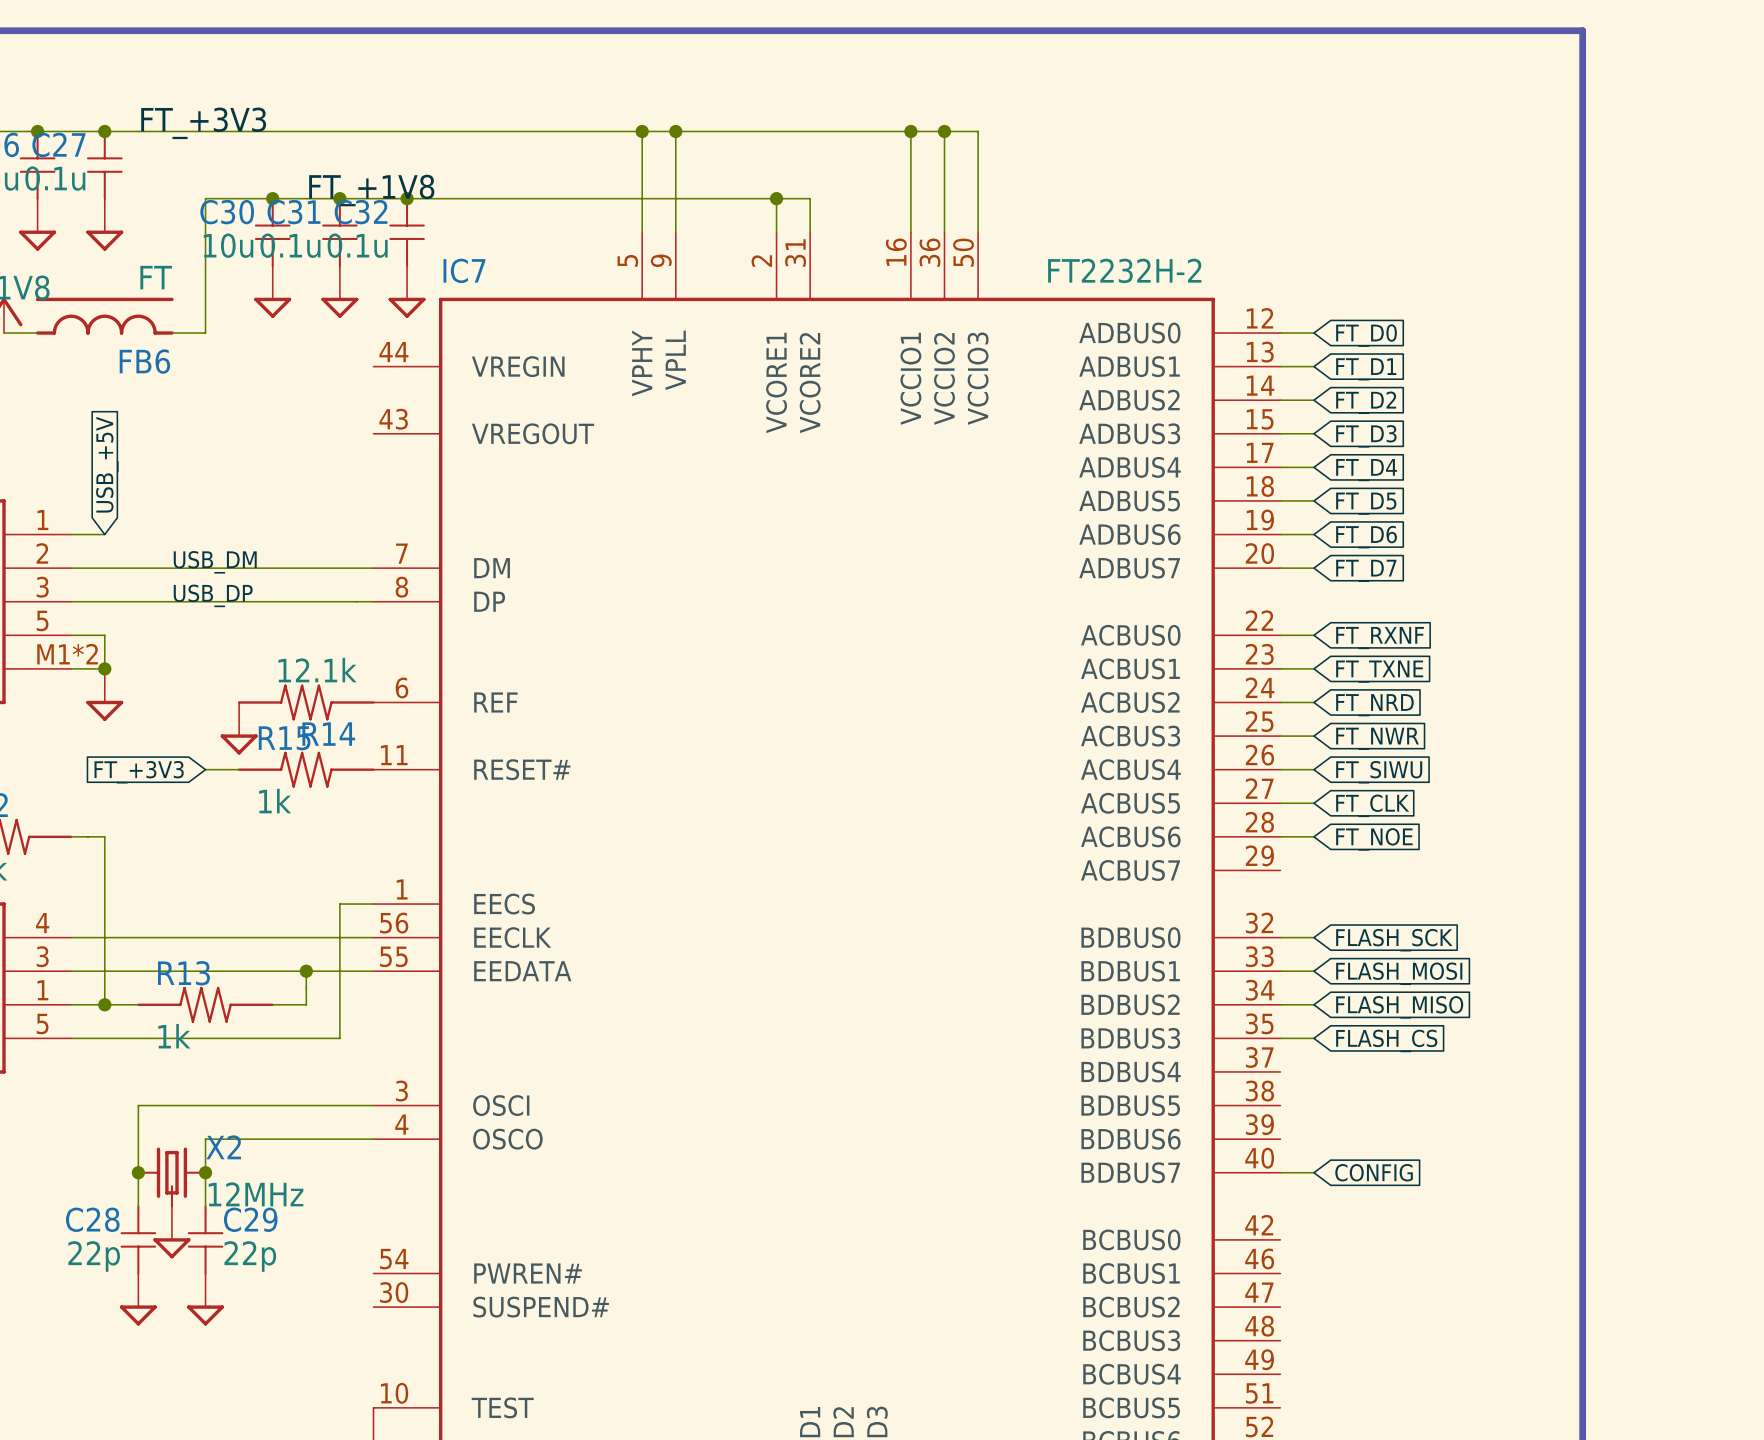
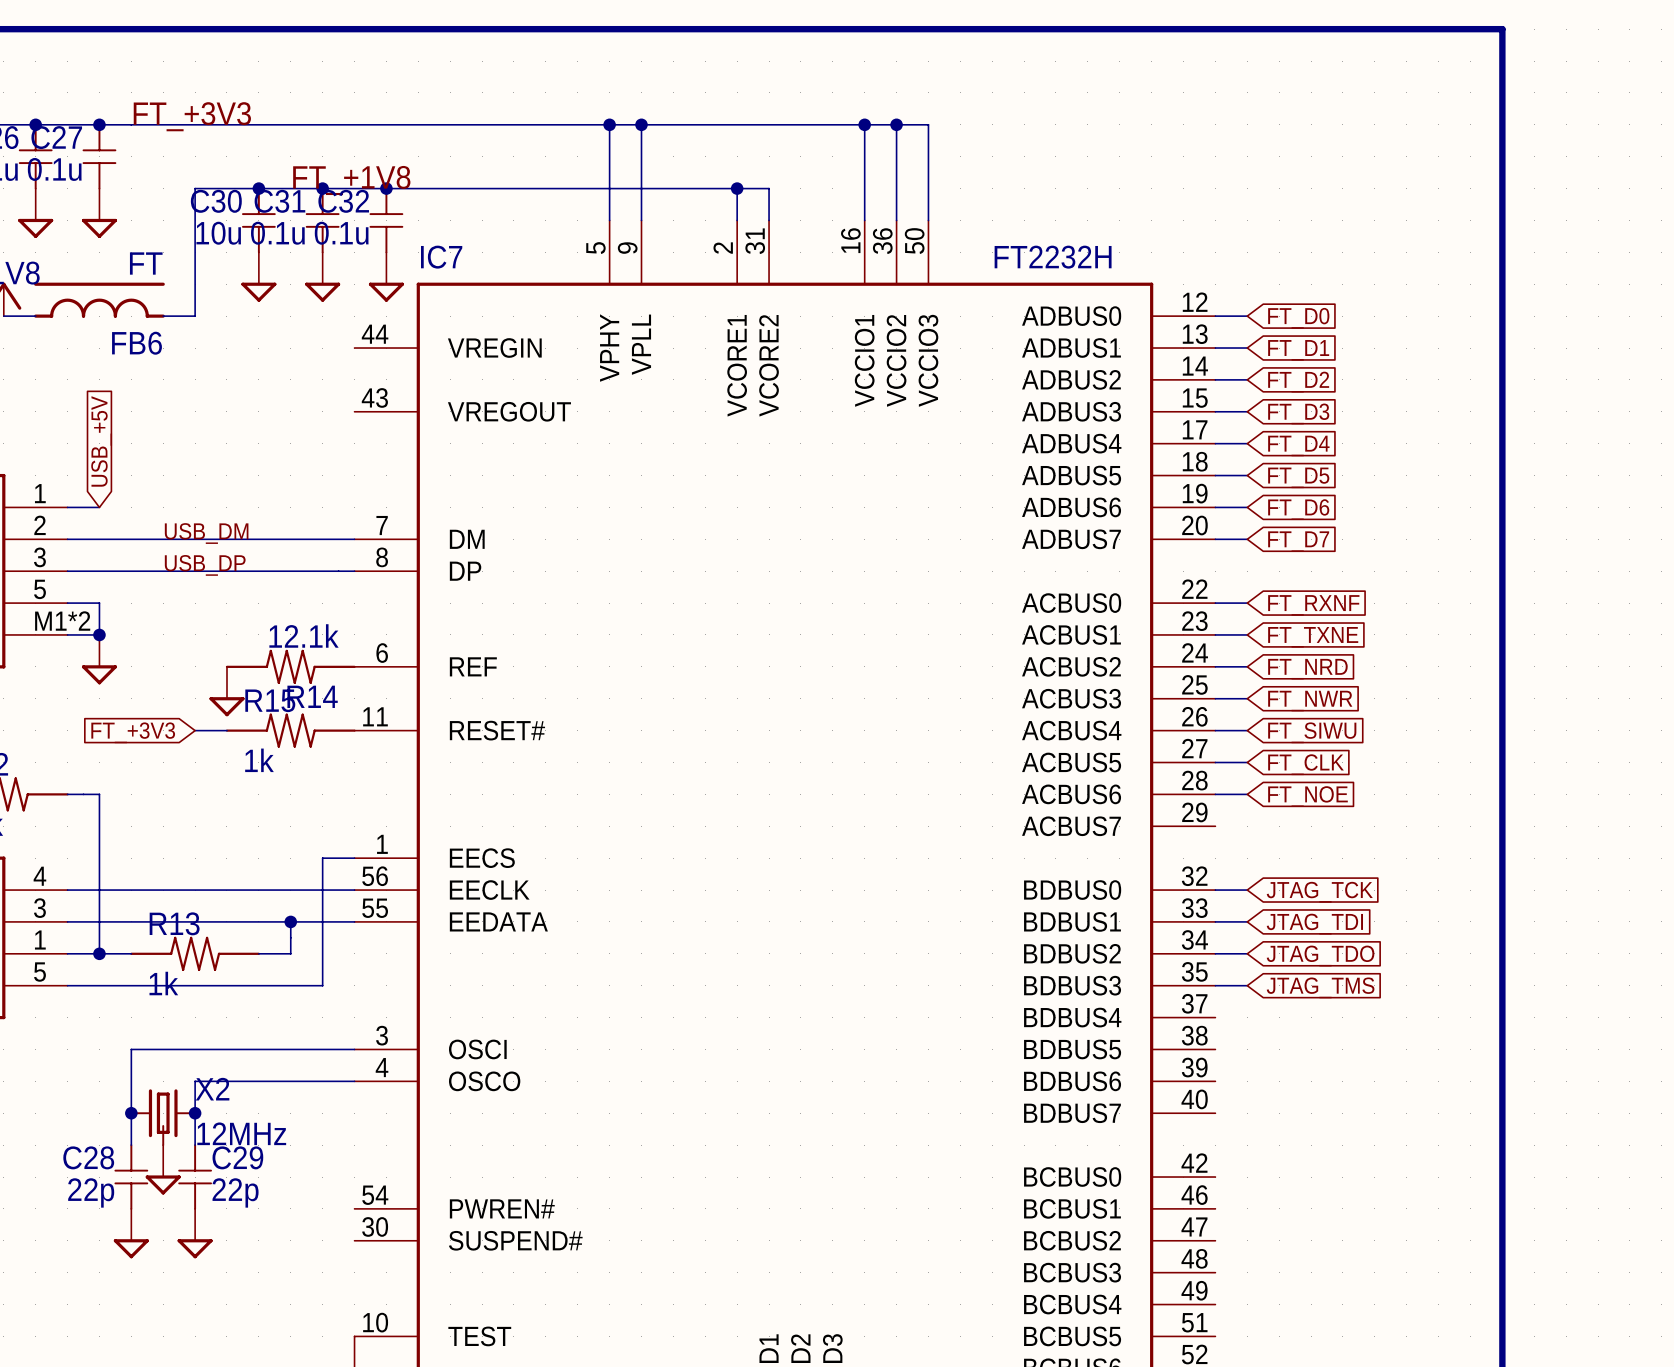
IC7 value: FT2232H-2 (1124, 270) -> FT2232H (1053, 257)
global label: FLASH_SCK (1394, 940) -> JTAG_TCK (1319, 892)
global label: FLASH_MOSI (1399, 973) -> JTAG_TDI (1314, 924)
global label: FLASH_MISO (1399, 1007) -> JTAG_TDO (1320, 956)
global label: FLASH_CS (1386, 1040) -> JTAG_TMS (1320, 987)
wire: (1280, 1172) (1313, 1172) -> none
global label: CONFIG (1374, 1172) -> none

